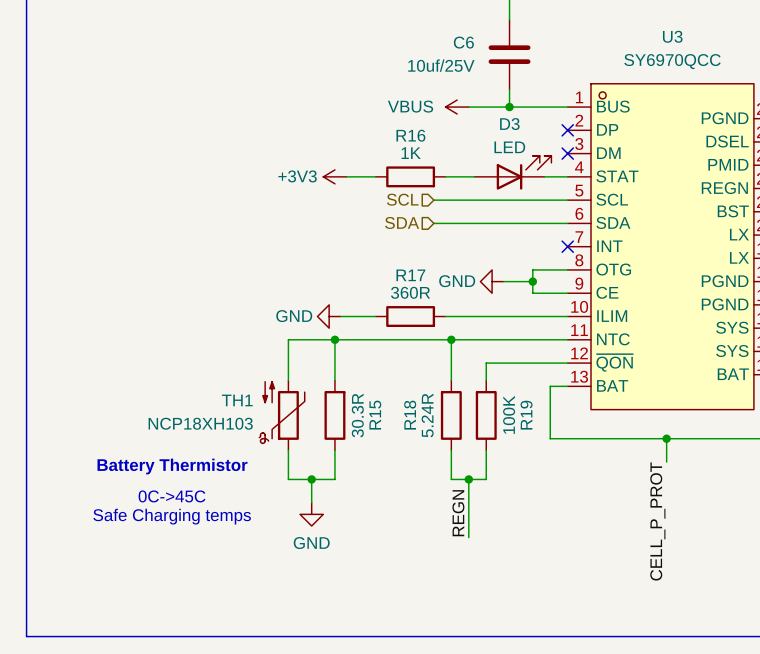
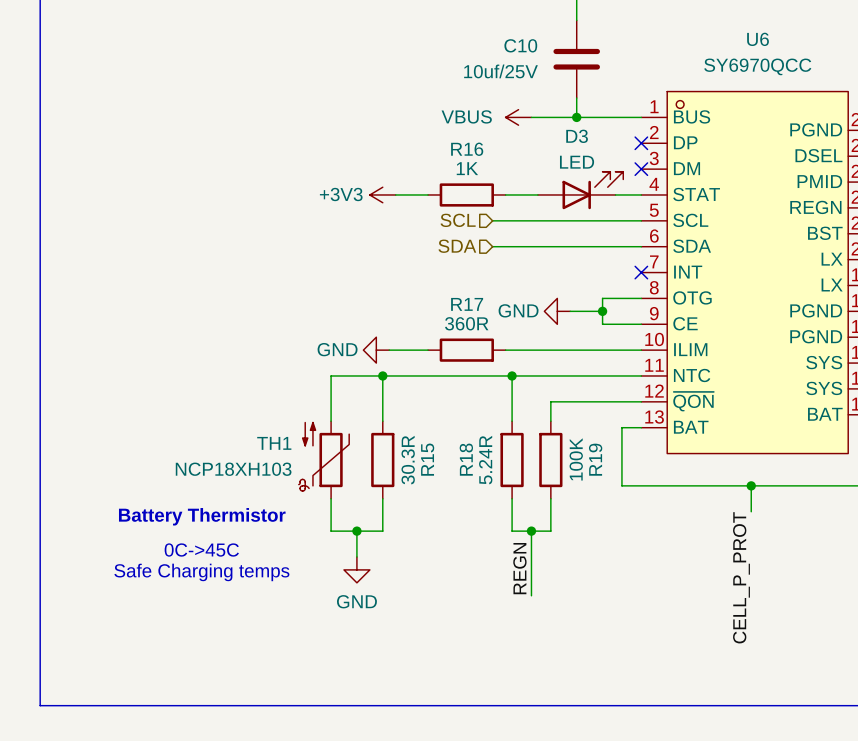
U3 name: U3 (672, 36) -> U6 (758, 39)
C6 name: C6 (463, 42) -> C10 (520, 45)

